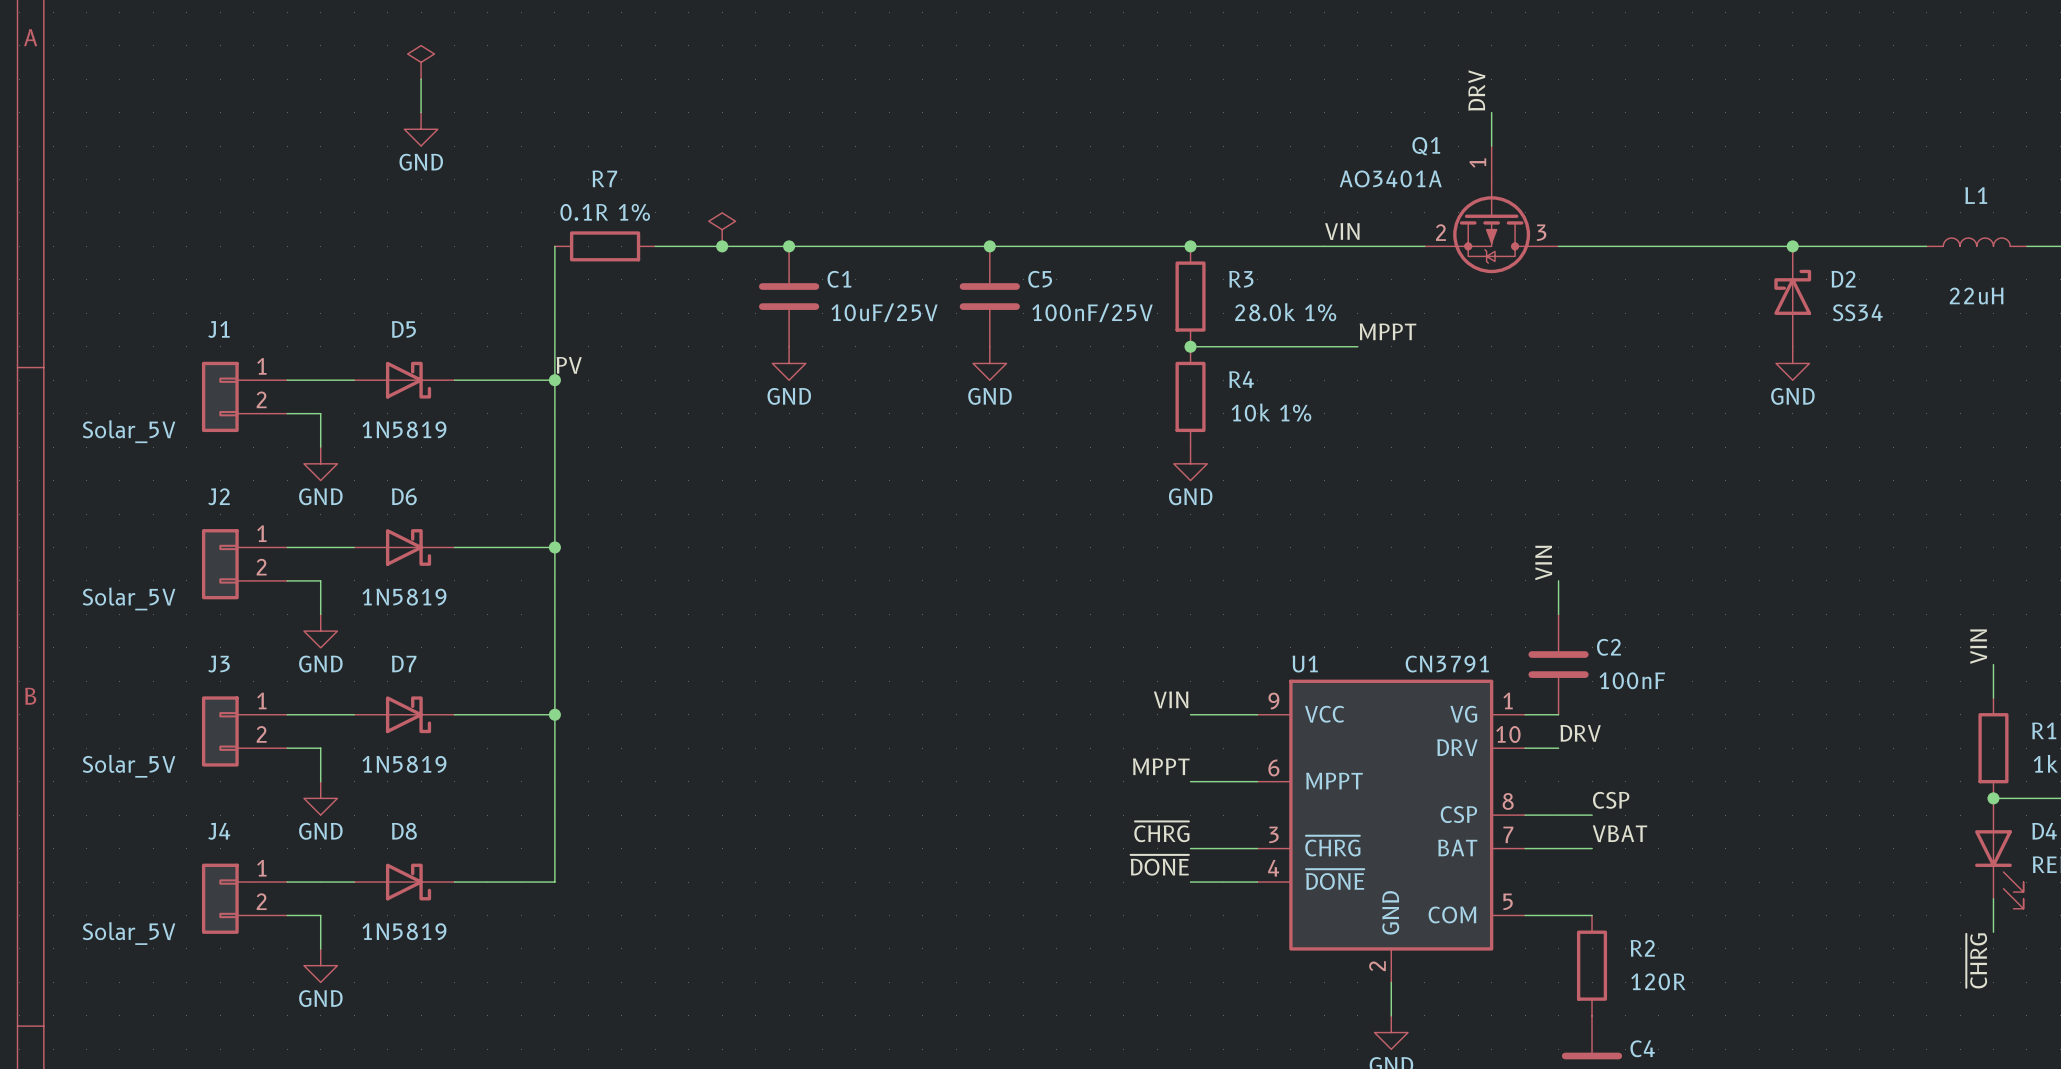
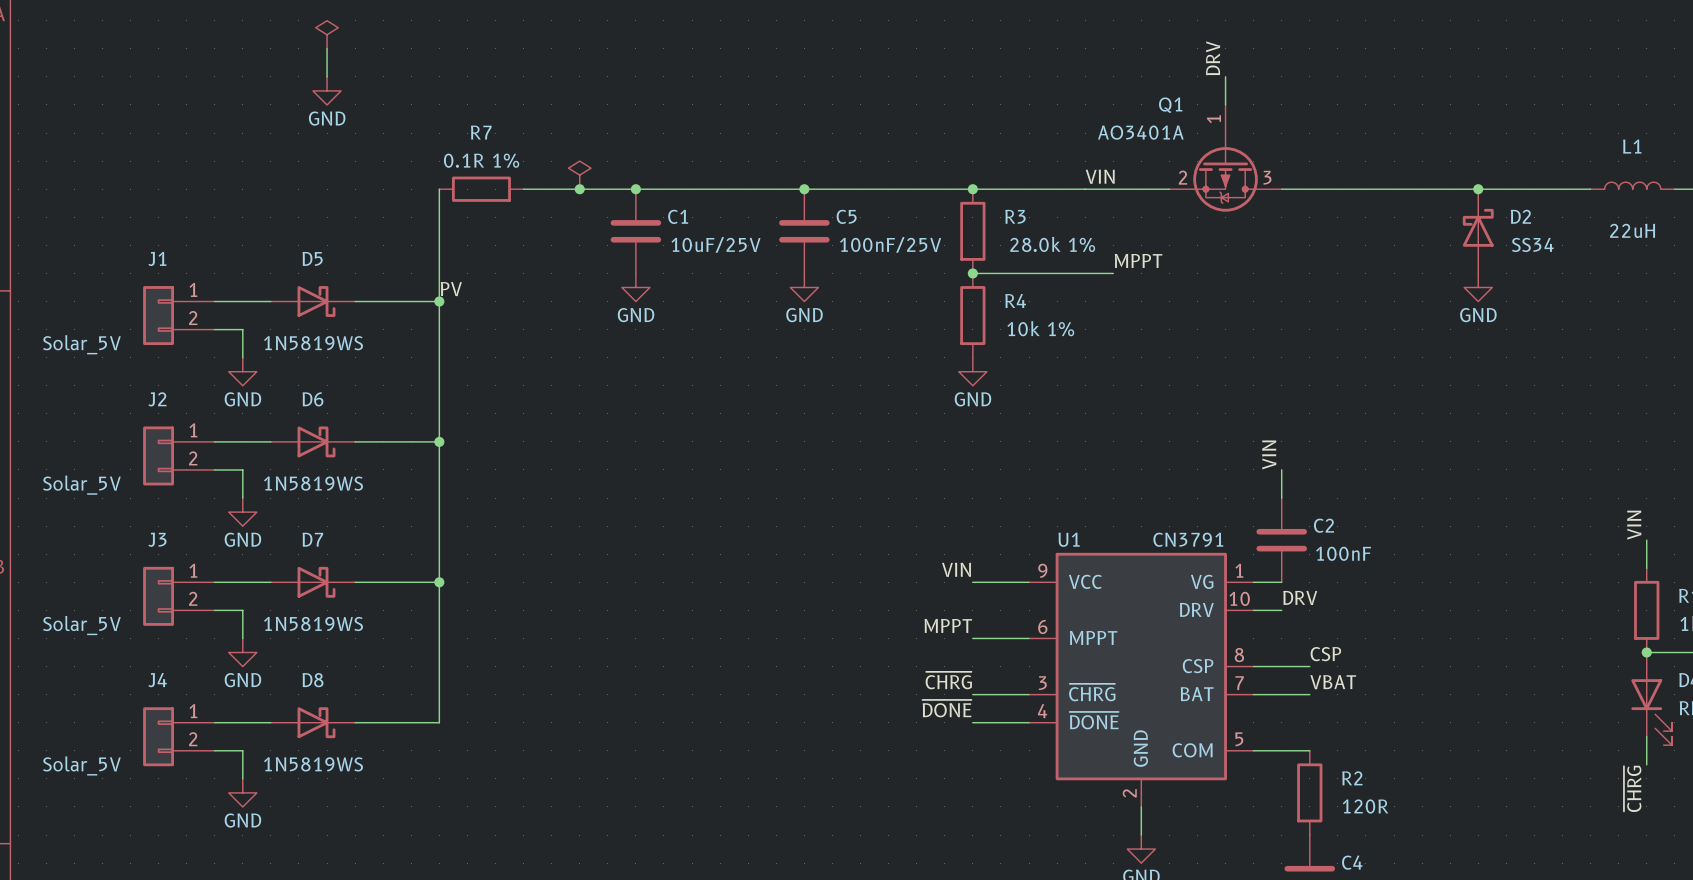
D5 value: 1N5819 (404, 429) -> 1N5819WS (313, 343)
D6 value: 1N5819 (404, 597) -> 1N5819WS (313, 483)
D7 value: 1N5819 (404, 764) -> 1N5819WS (313, 623)
D8 value: 1N5819 (404, 931) -> 1N5819WS (313, 764)

